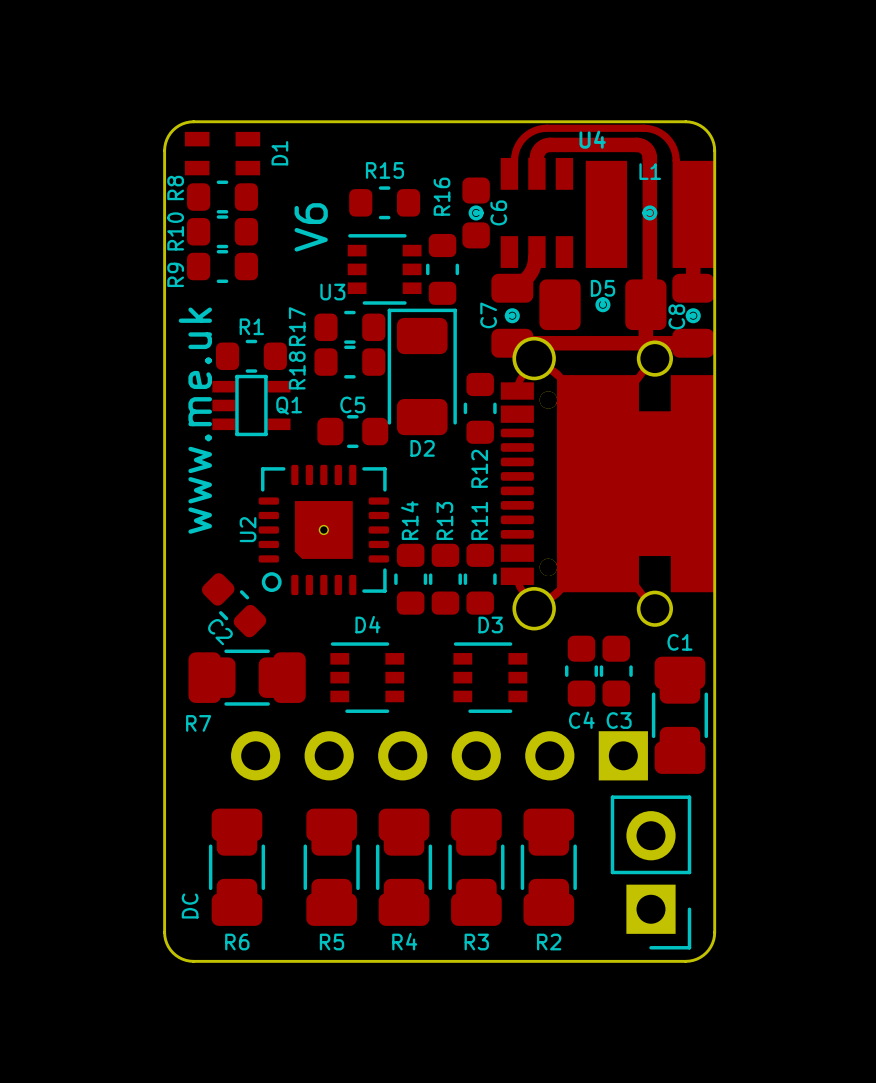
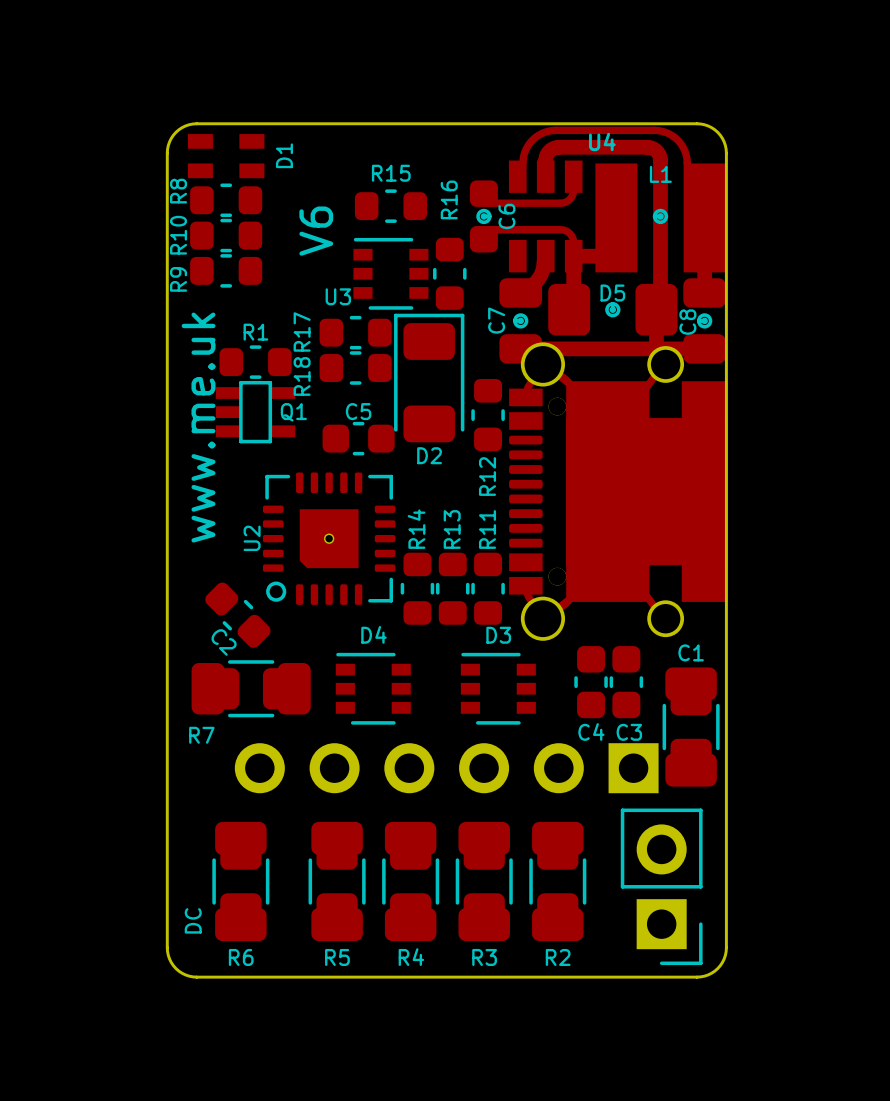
U4 footprint: [462, 124, 715, 358] -> [469, 126, 726, 364]

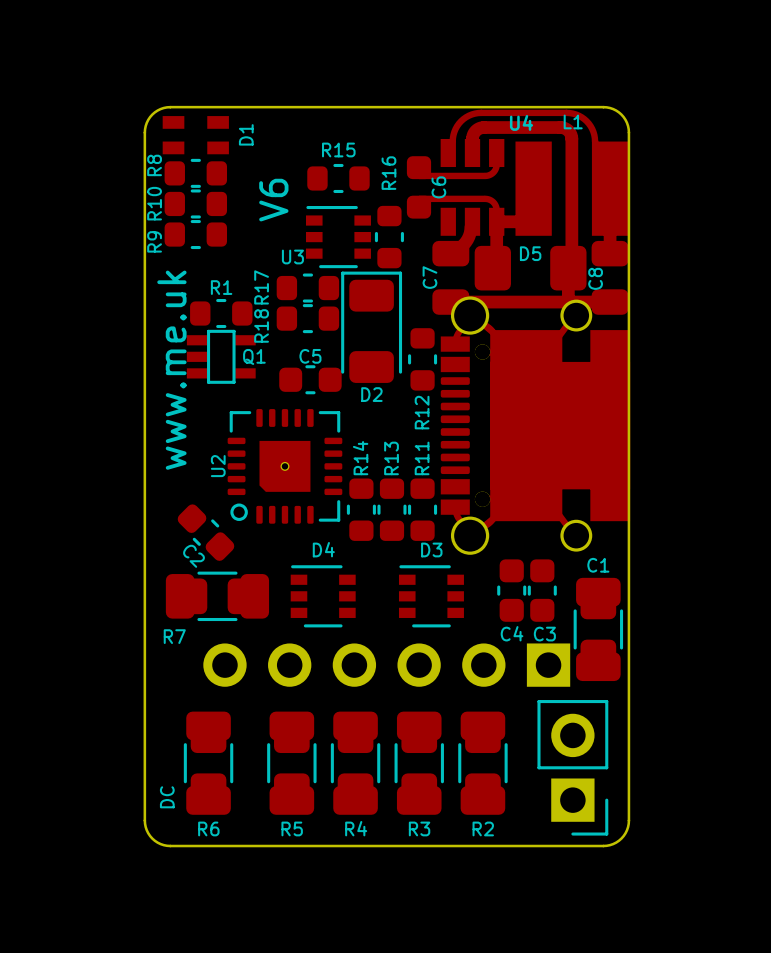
U4 footprint: [469, 126, 726, 364] -> [406, 109, 629, 315]
C6 footprint: [476, 208, 492, 225] -> [431, 176, 447, 199]
L1 footprint: [652, 208, 669, 225] -> [563, 114, 583, 130]
D5 footprint: [605, 302, 621, 318] -> [519, 246, 542, 262]
C7 footprint: [513, 313, 529, 329] -> [422, 266, 438, 289]
C8 footprint: [696, 313, 713, 329] -> [588, 267, 603, 290]

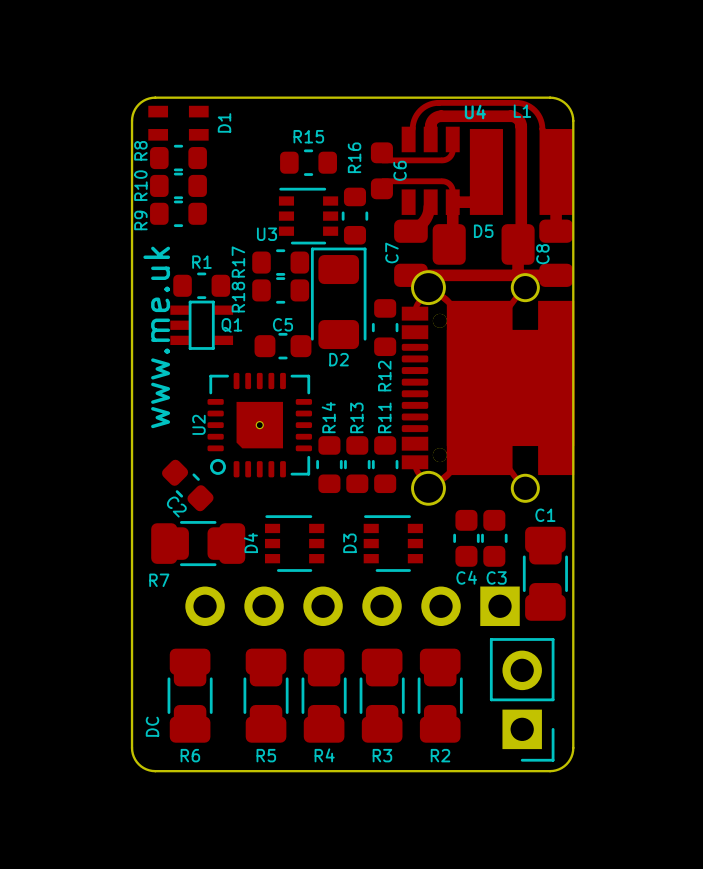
text: V6 (273, 200) -> none
D4 name rotation: 0° (323, 549) -> 90° counterclockwise (250, 543)
D4 name position: D4 (323, 549) -> D4 (250, 543)
D3 name rotation: 0° (431, 549) -> 90° counterclockwise (349, 543)
D3 name position: D3 (431, 549) -> D3 (349, 543)

